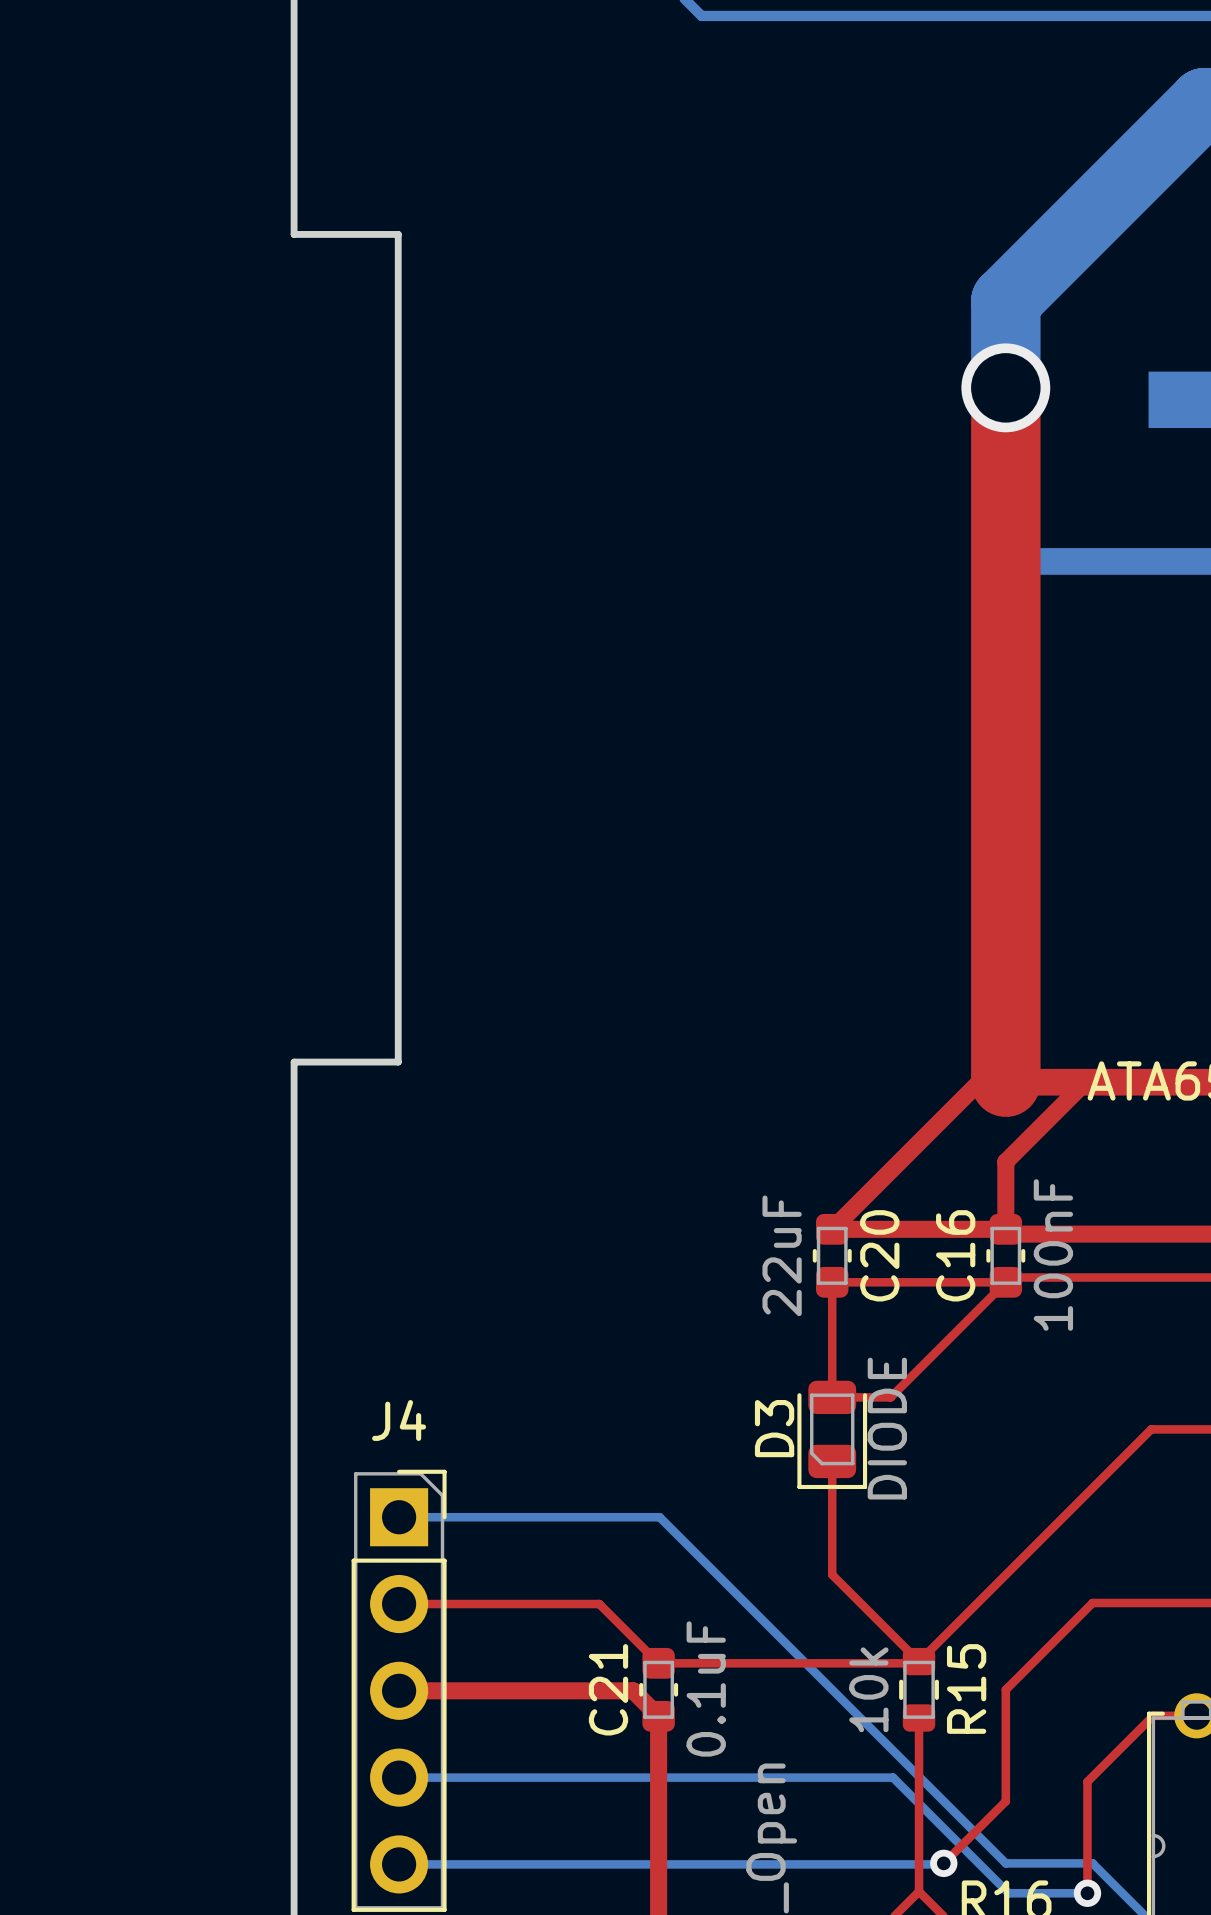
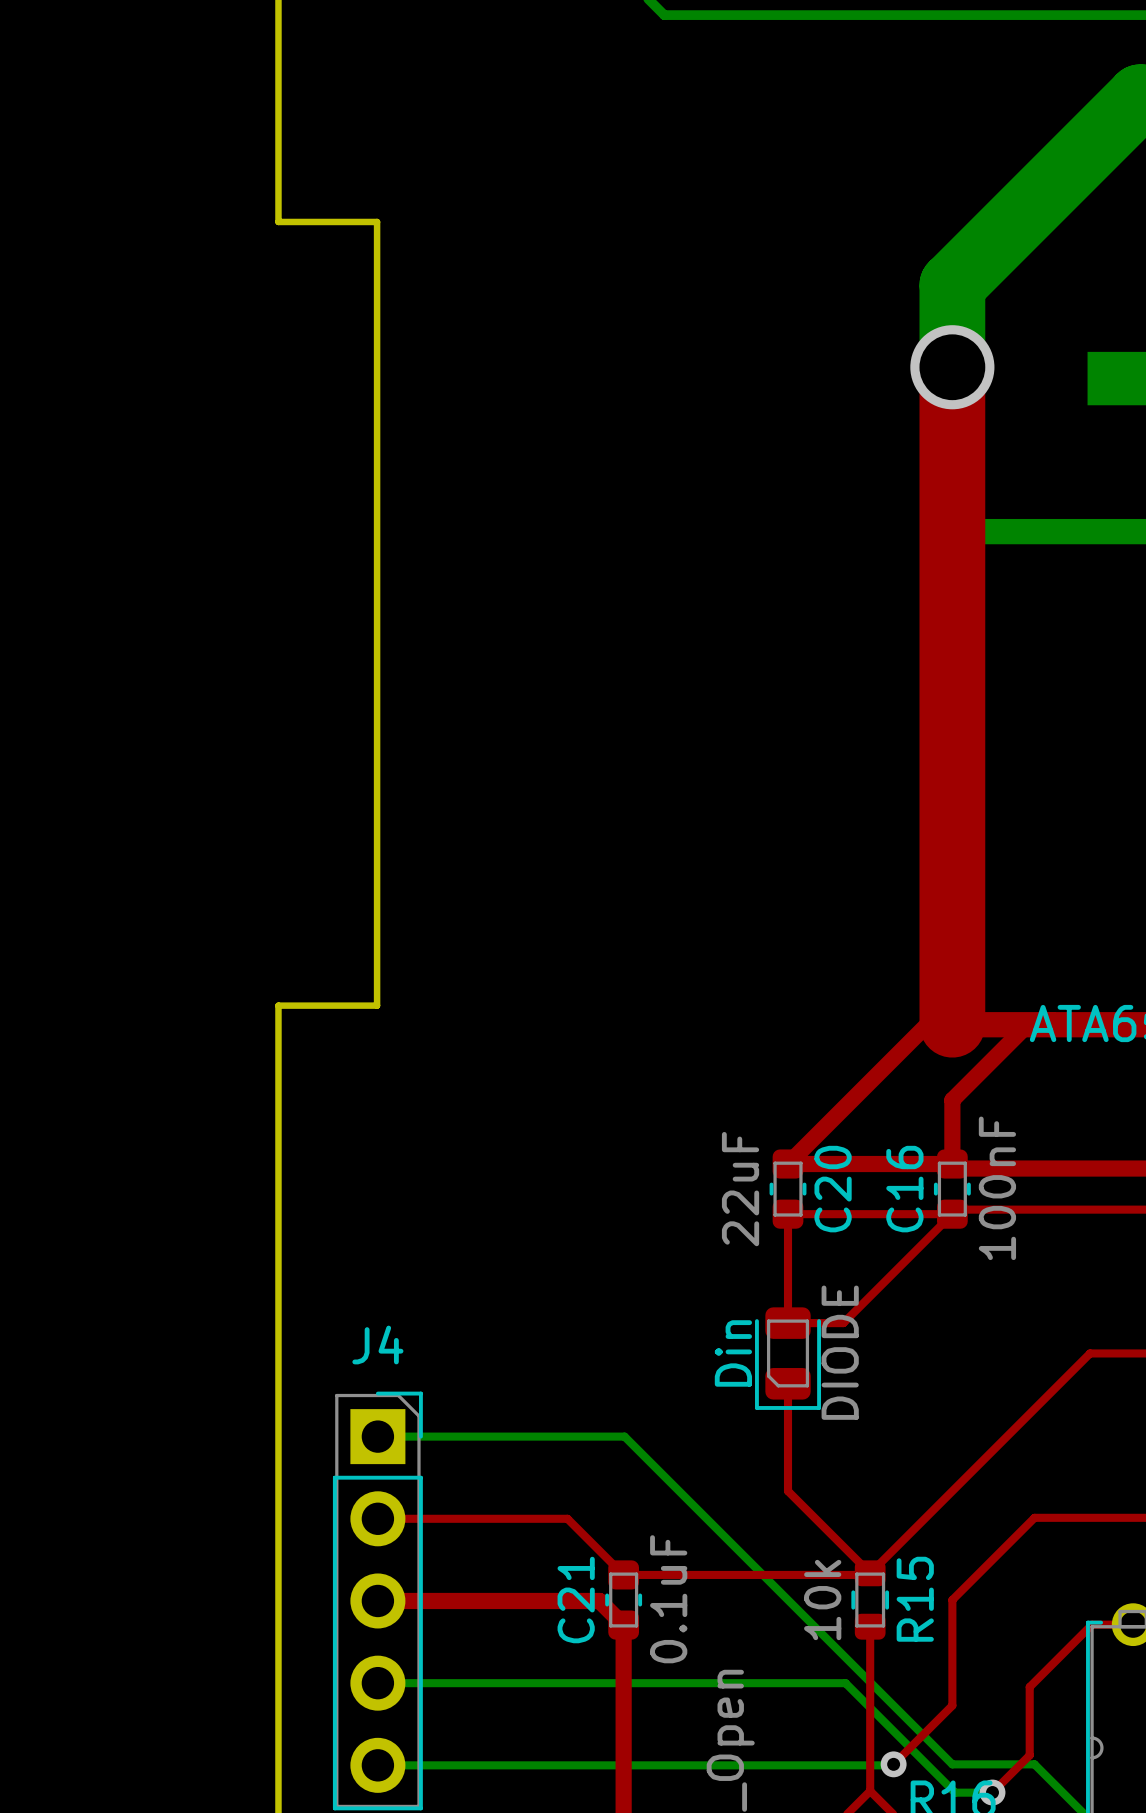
D3 name: D3 (774, 1428) -> Din (733, 1353)
top track: (1087, 1853) (1087, 1893) -> (1029, 1755) (992, 1792)
bottom track: (1048, 1893) (1087, 1893) -> none
via position: (1087, 1893) -> (992, 1792)

